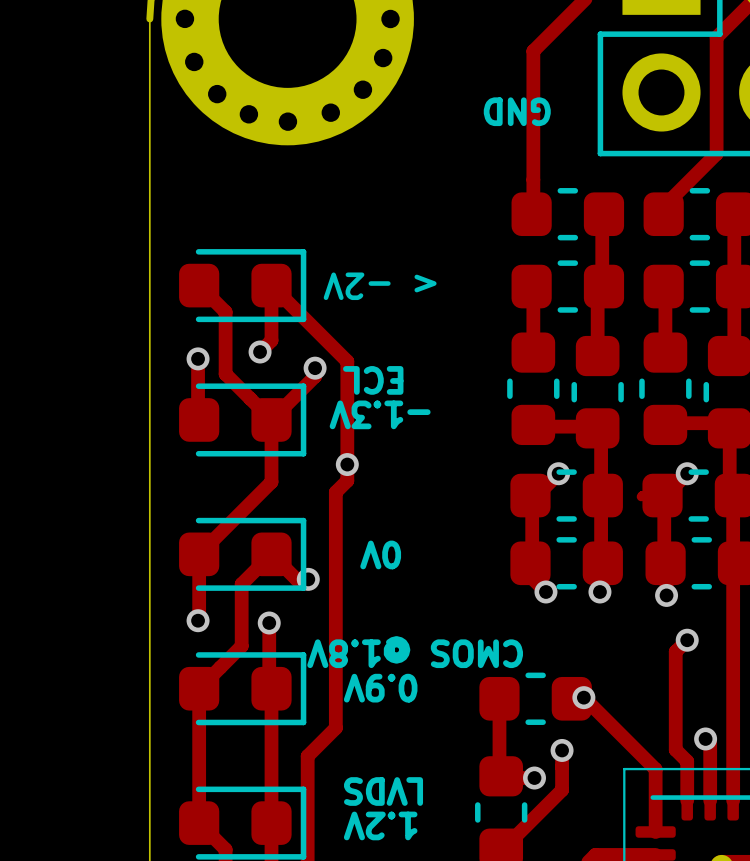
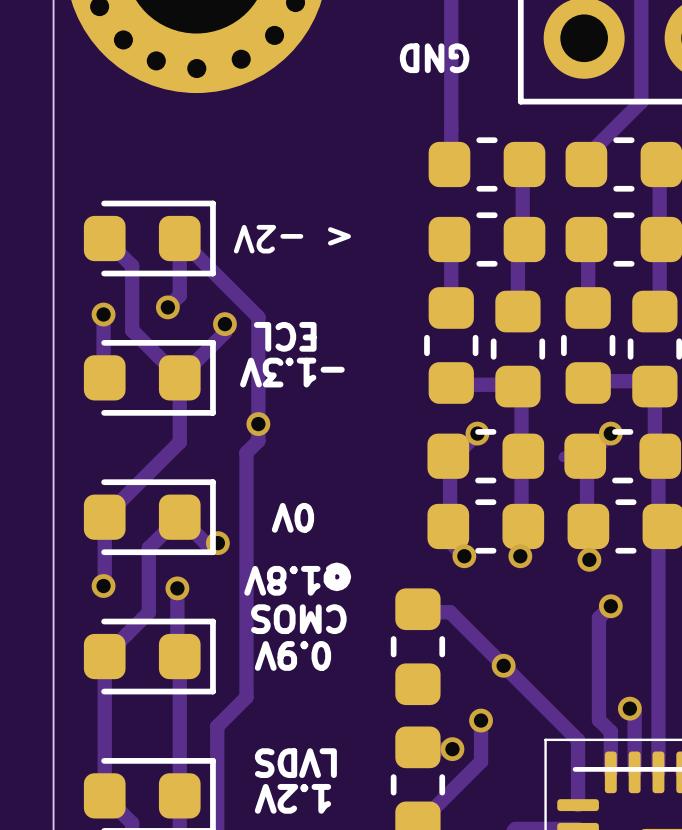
track: none -> (417, 612) (450, 612) (503, 665)
text: none -> CMOS (298, 619)
text: CMOS @1.8V (415, 652) -> @1.8V (297, 579)
track: (499, 698) (499, 774) (501, 776) -> none
part rotation: 0° (535, 698) -> 90° clockwise (417, 646)

